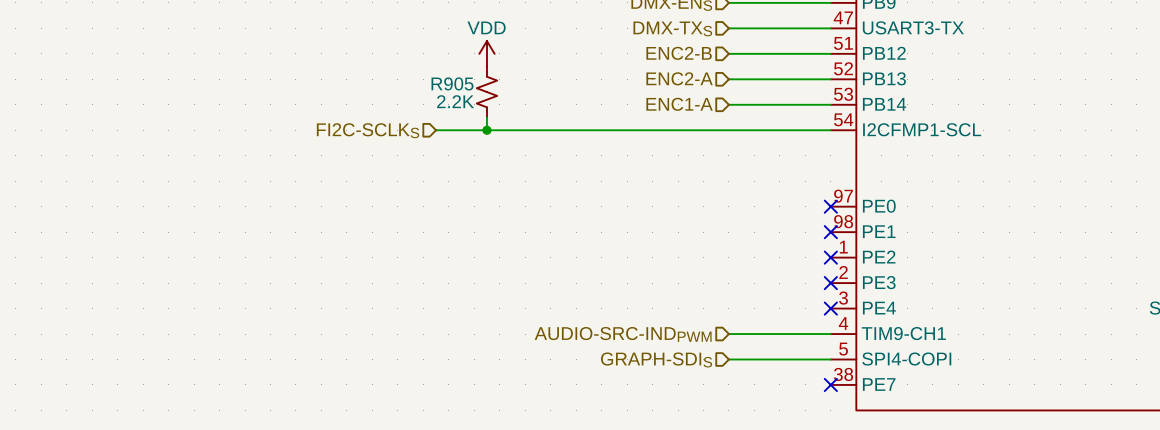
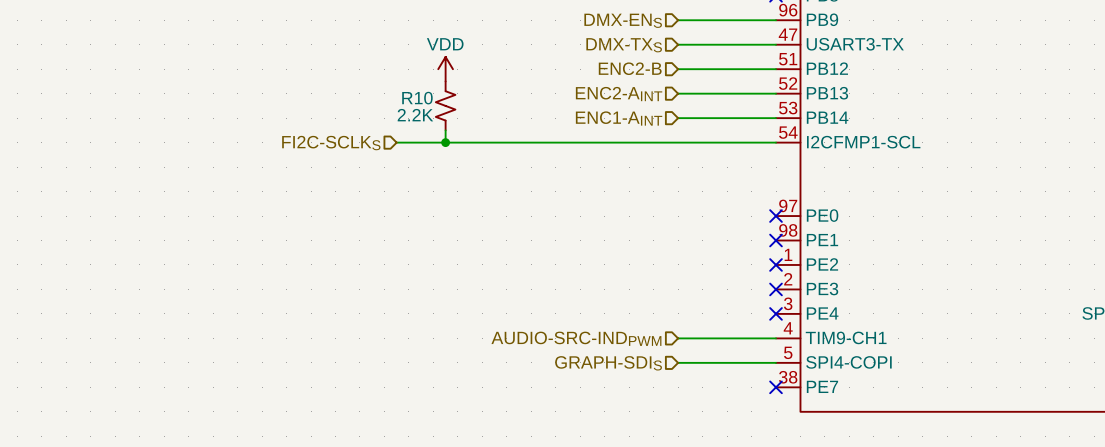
hierarchical label: ENC2-A (679, 78) -> ENC2-AINT (619, 94)
R905 name: R905 (452, 83) -> R10 (417, 98)
hierarchical label: ENC1-A (679, 104) -> ENC1-AINT (619, 118)

